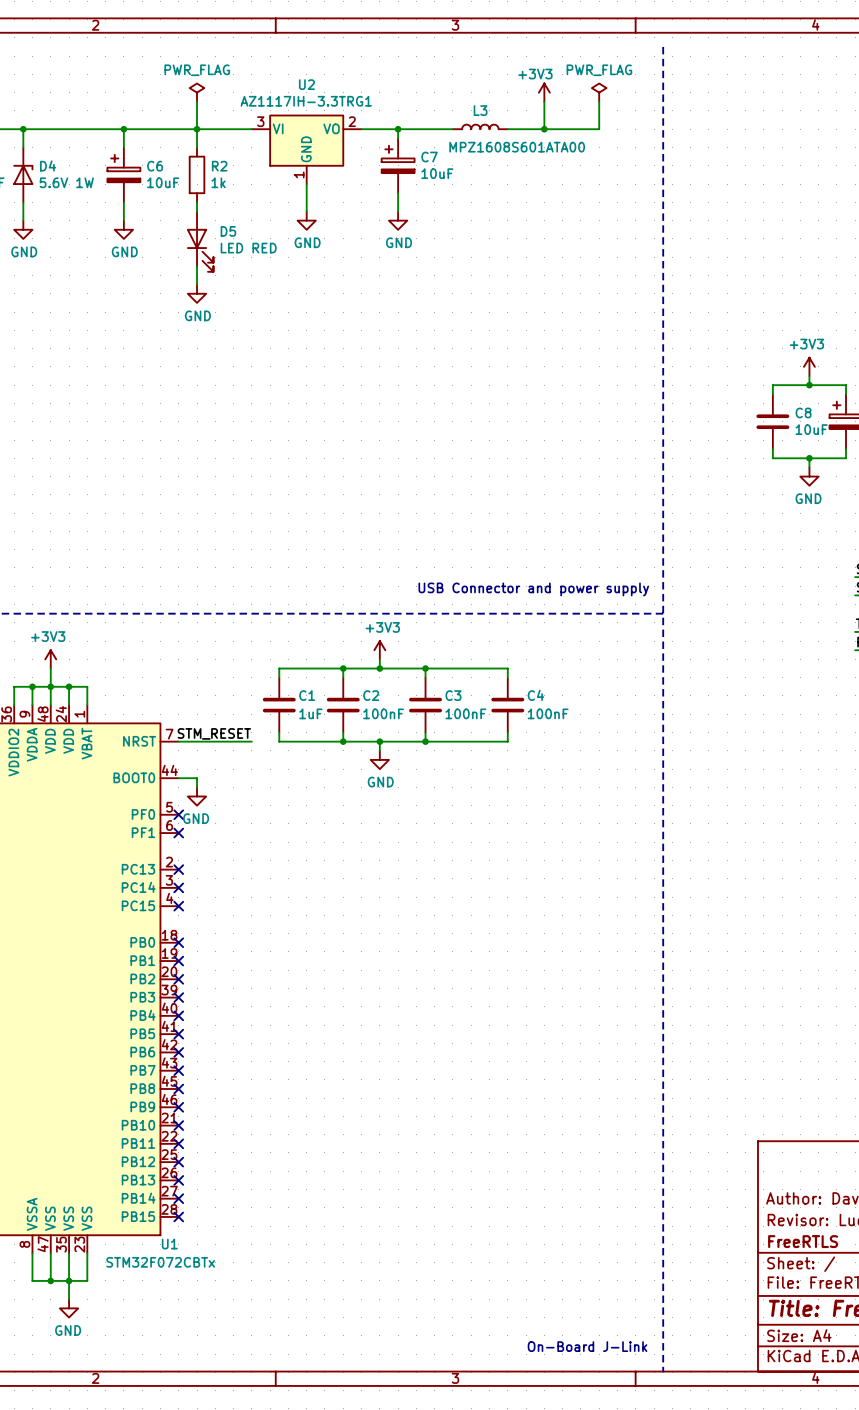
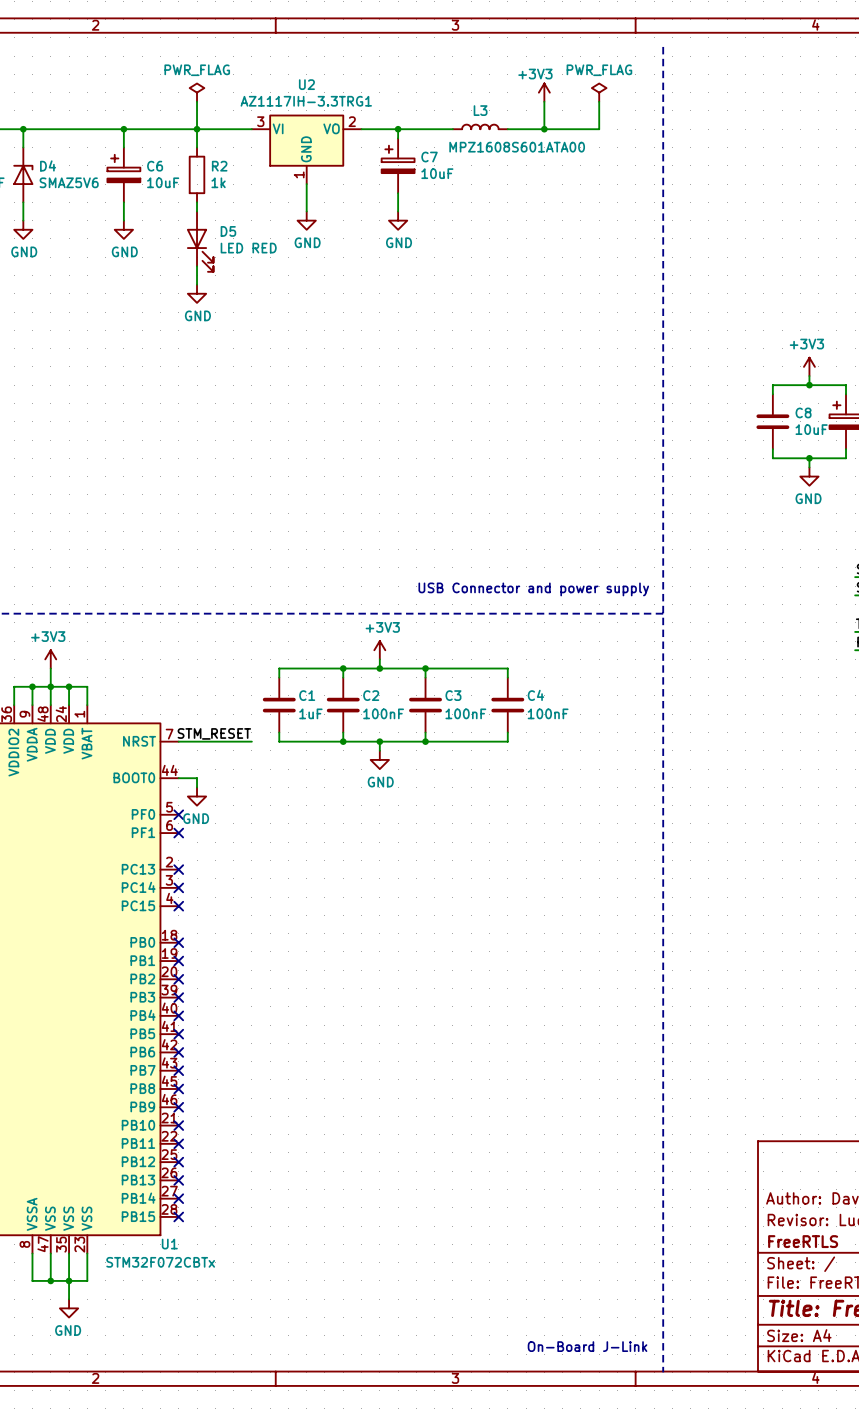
D4 value: 5.6V 1W (66, 182) -> SMAZ5V6 (69, 182)

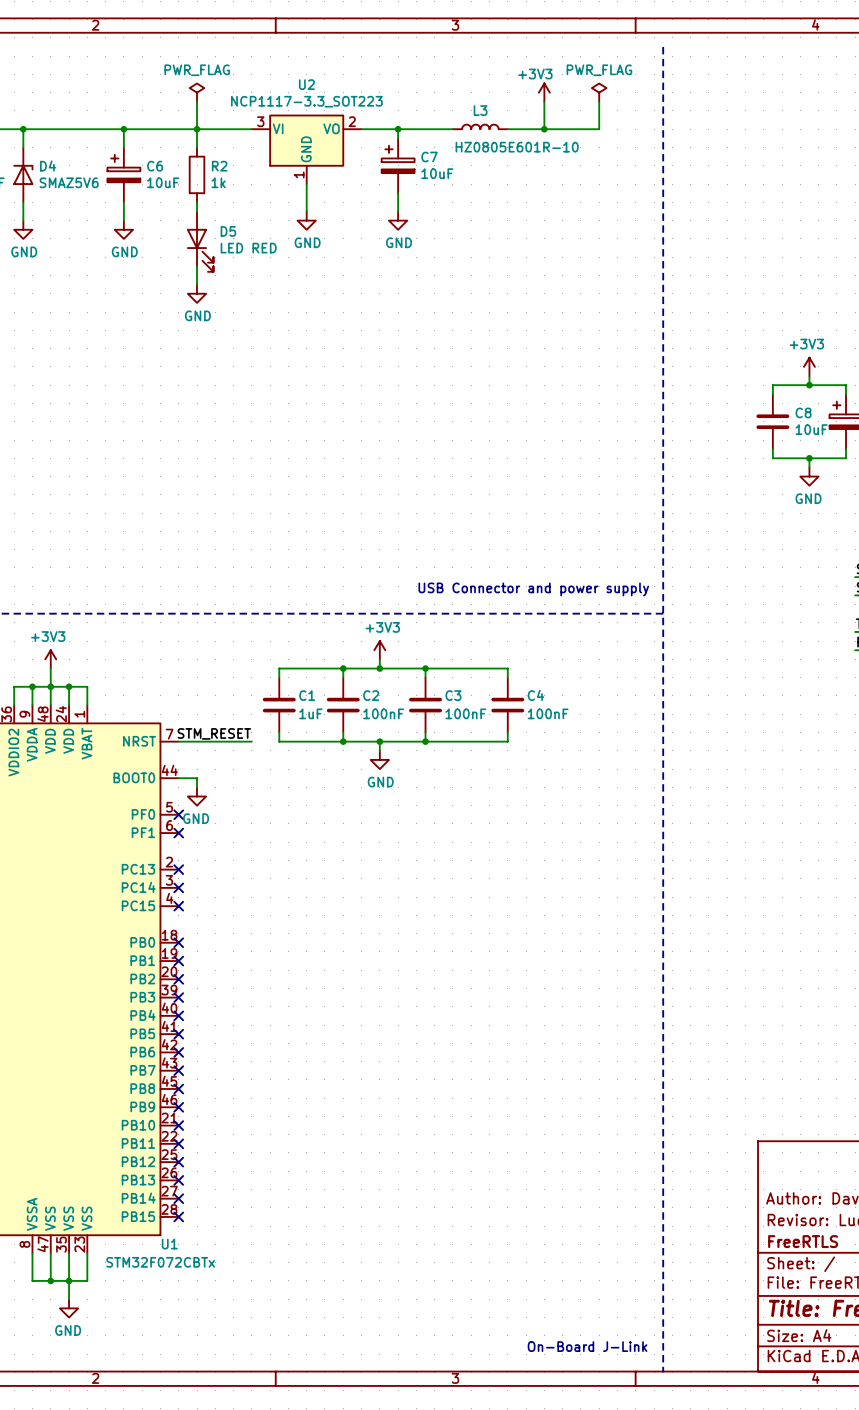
U2 value: AZ1117IH-3.3TRG1 (306, 101) -> NCP1117-3.3_SOT223 (306, 101)
L3 value: MPZ1608S601ATA00 (517, 147) -> HZ0805E601R-10 (517, 147)

